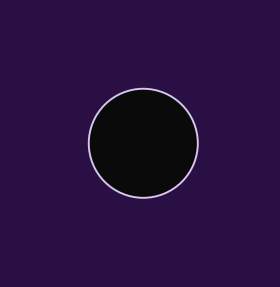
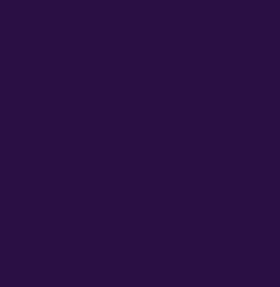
part: (143, 143) -> none

